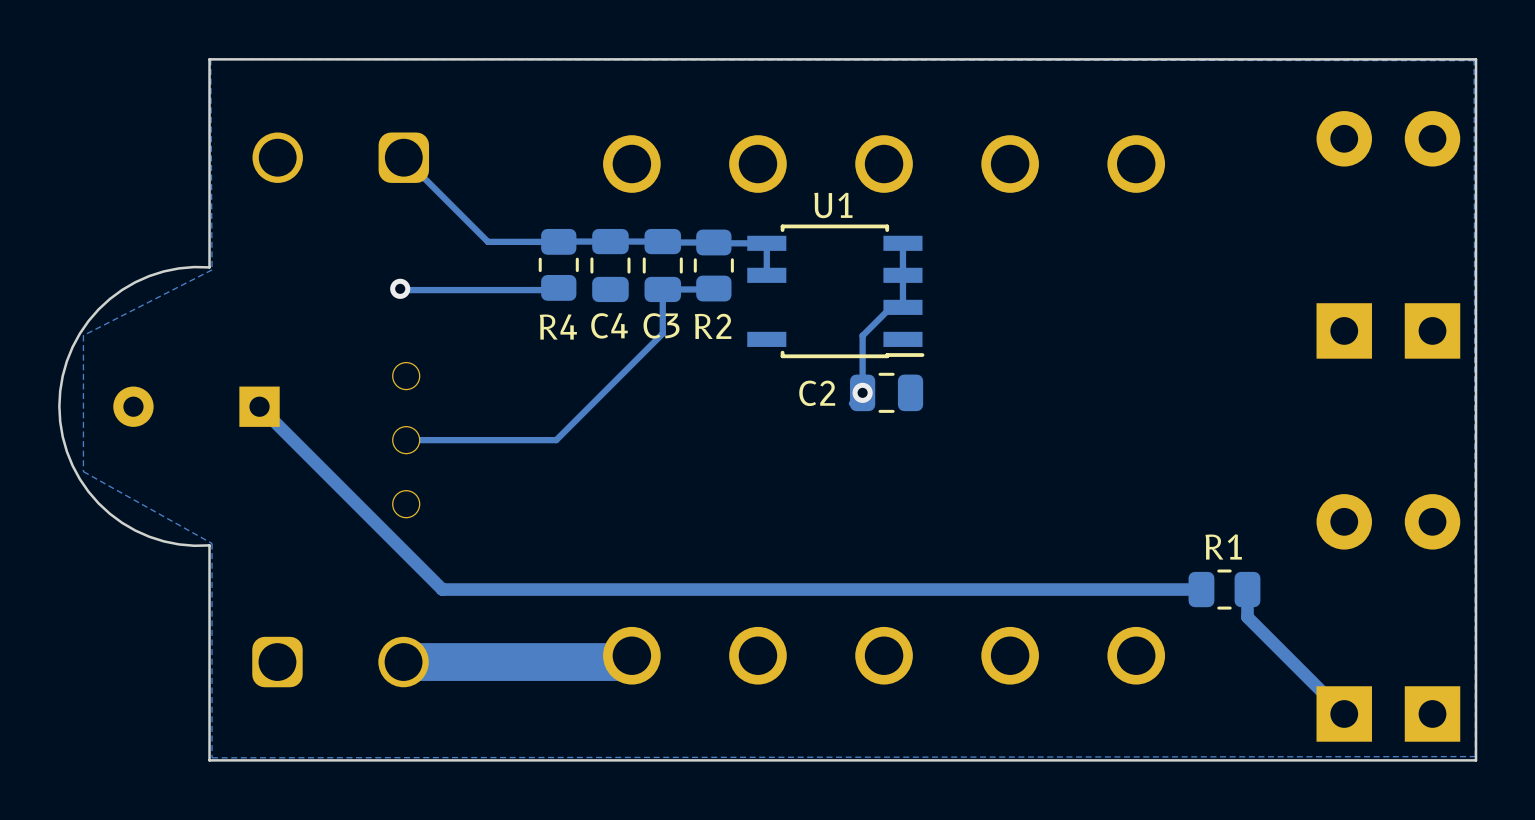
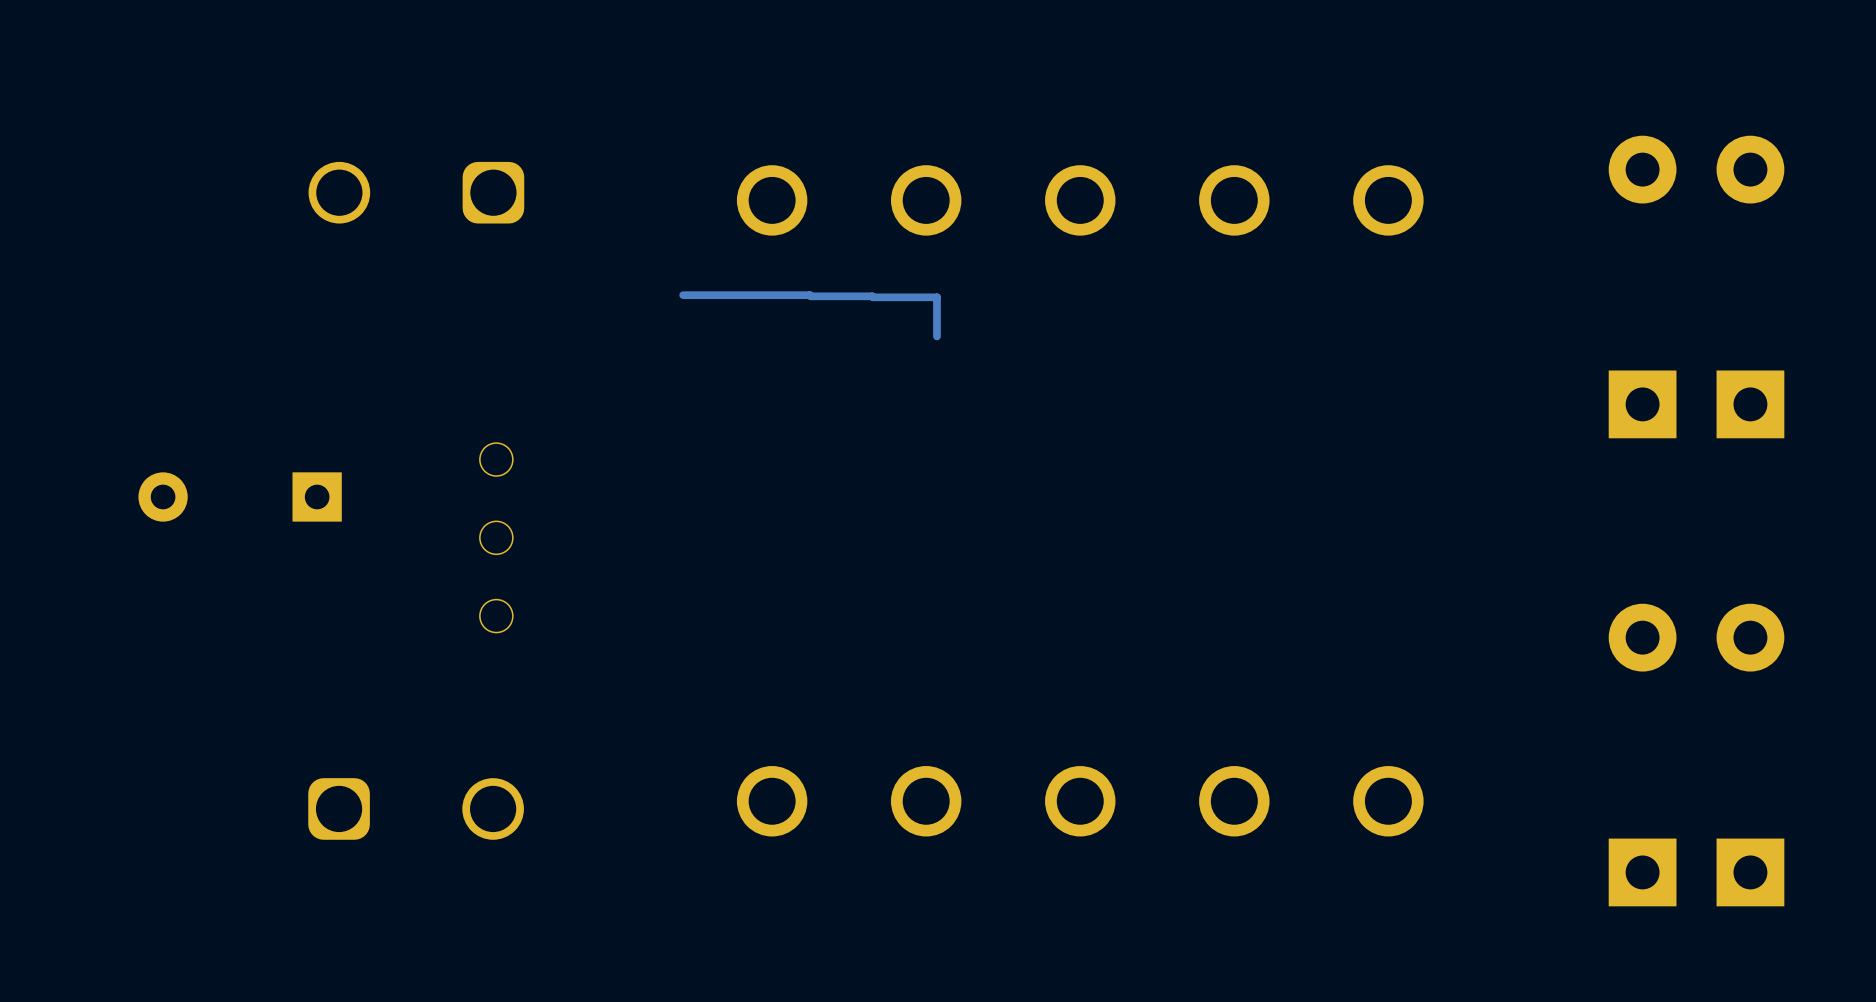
zone outline: (210, 59) (1474, 60) (1475, 756) (212, 757) (212, 543) (83, 471) (83, 335) (212, 269) (210, 59) -> none
board edge: (1476, 59) (1476, 760) (209, 760) (209, 545) (178, 544) (149, 536) (135, 530) (109, 513) (98, 503) (79, 479) (72, 465) (62, 436) (59, 406) (62, 376) (72, 347) (88, 321) (109, 299) (122, 289) (149, 276) (178, 268) (209, 267) (209, 59) (1476, 59) -> none
track: (403, 157) (487, 241) (558, 241) -> none
track: (902, 243) (902, 307) (890, 307) (862, 335) (862, 392) (851, 403) -> none
R4: (558, 264) -> none
C4: (610, 265) -> none
C3: (662, 265) -> none
R2: (713, 265) -> none
track: (558, 287) (556, 290) (398, 290) (400, 288) -> none
via: (400, 288) -> none
track: (713, 288) (662, 289) (662, 333) (556, 440) (406, 440) -> none
U1: (835, 291) -> none
via: (862, 392) -> none
C2: (886, 392) -> none
track: (259, 406) (442, 589) (1201, 589) -> none
R1: (1224, 589) -> none
track: (1247, 589) (1247, 617) (1344, 713) -> none
track: (631, 655) (625, 662) (403, 662) -> none

